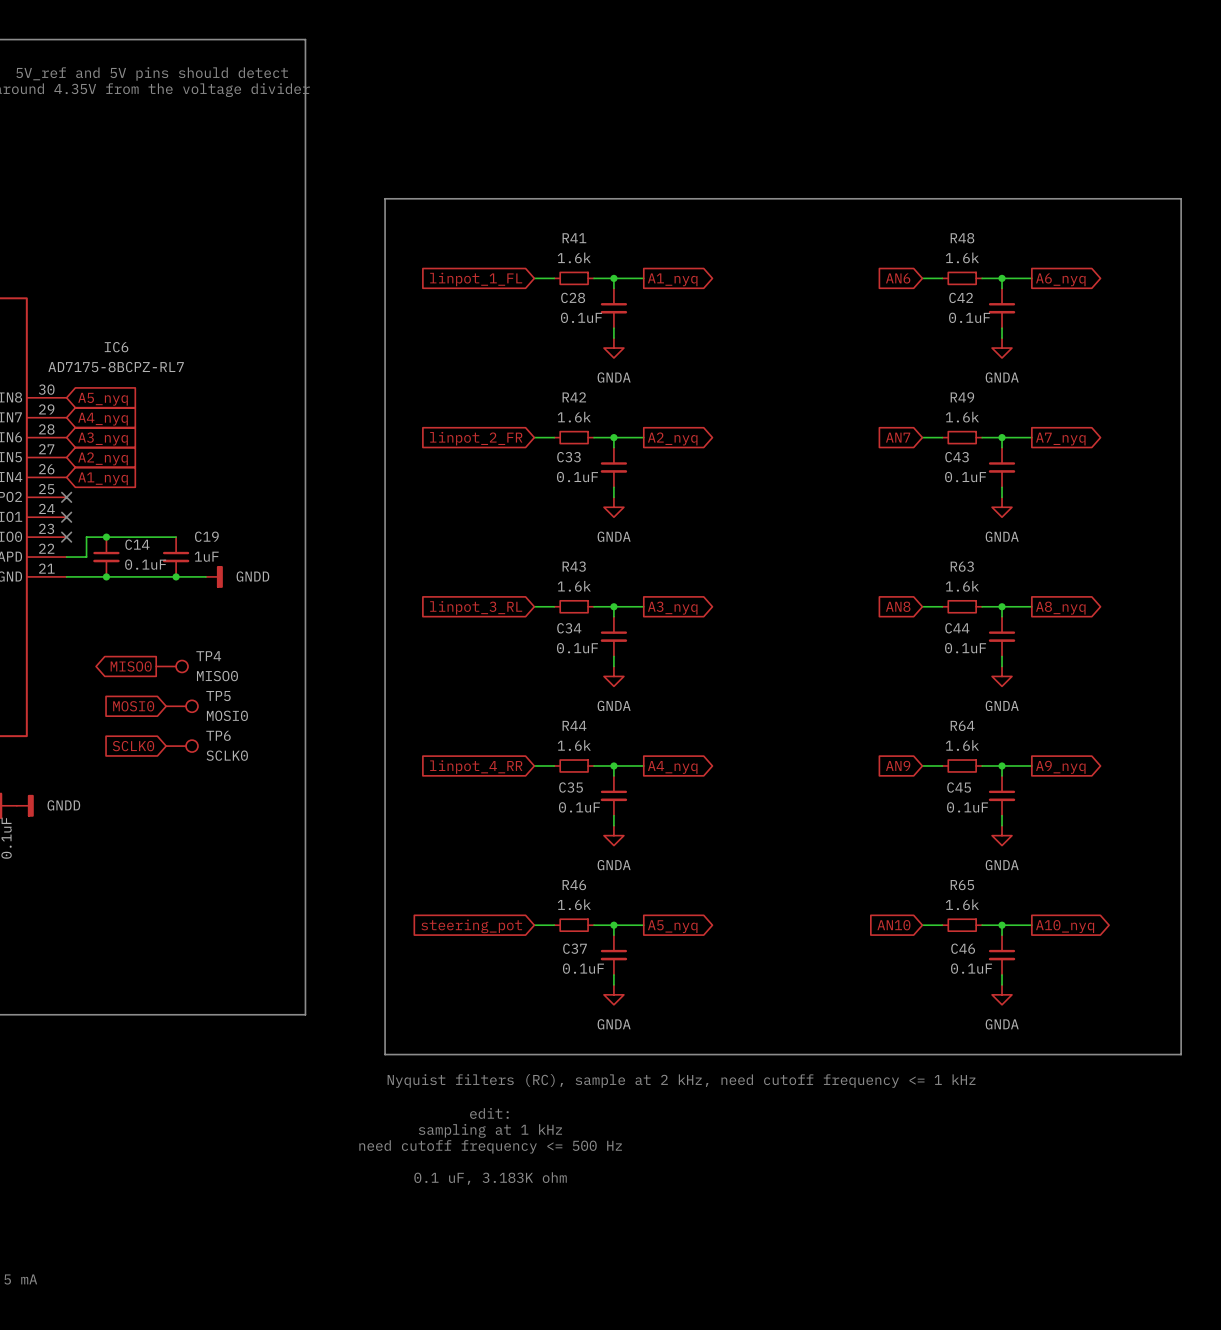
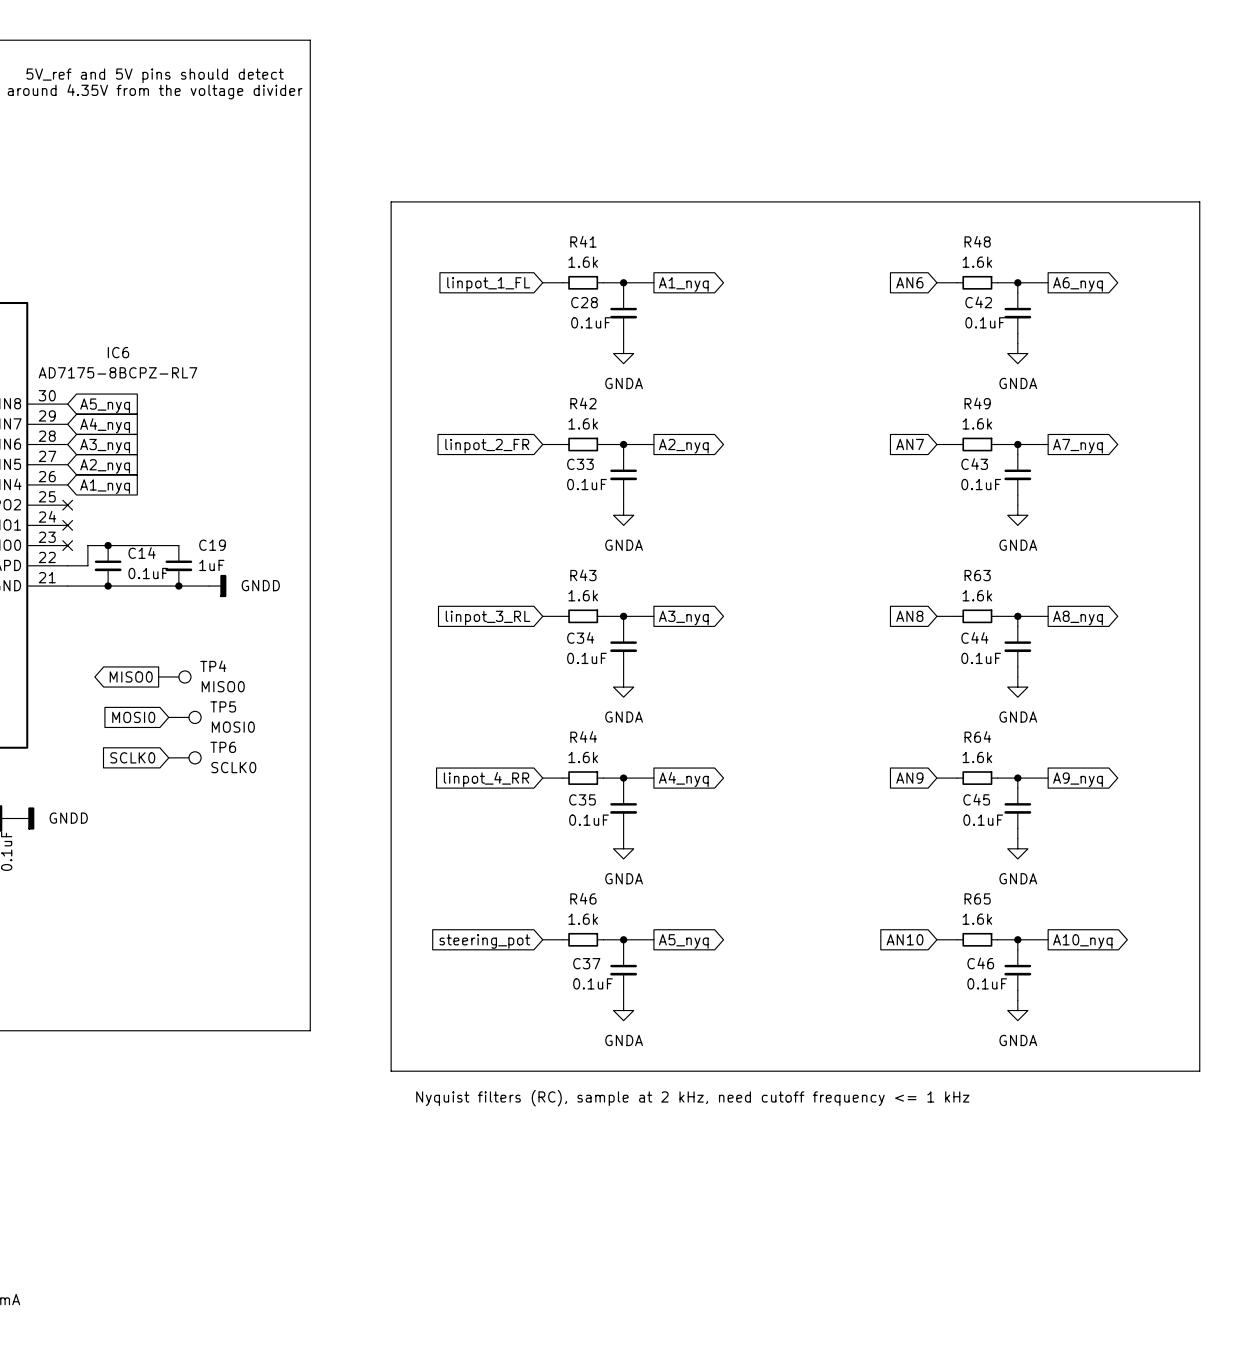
text: edit: (489, 1113) -> none
text: sampling at 1 kHz (490, 1130) -> none
text: need cutoff frequency <= 500 Hz (490, 1146) -> none
text: 0.1 uF, 3.183K ohm (490, 1178) -> none

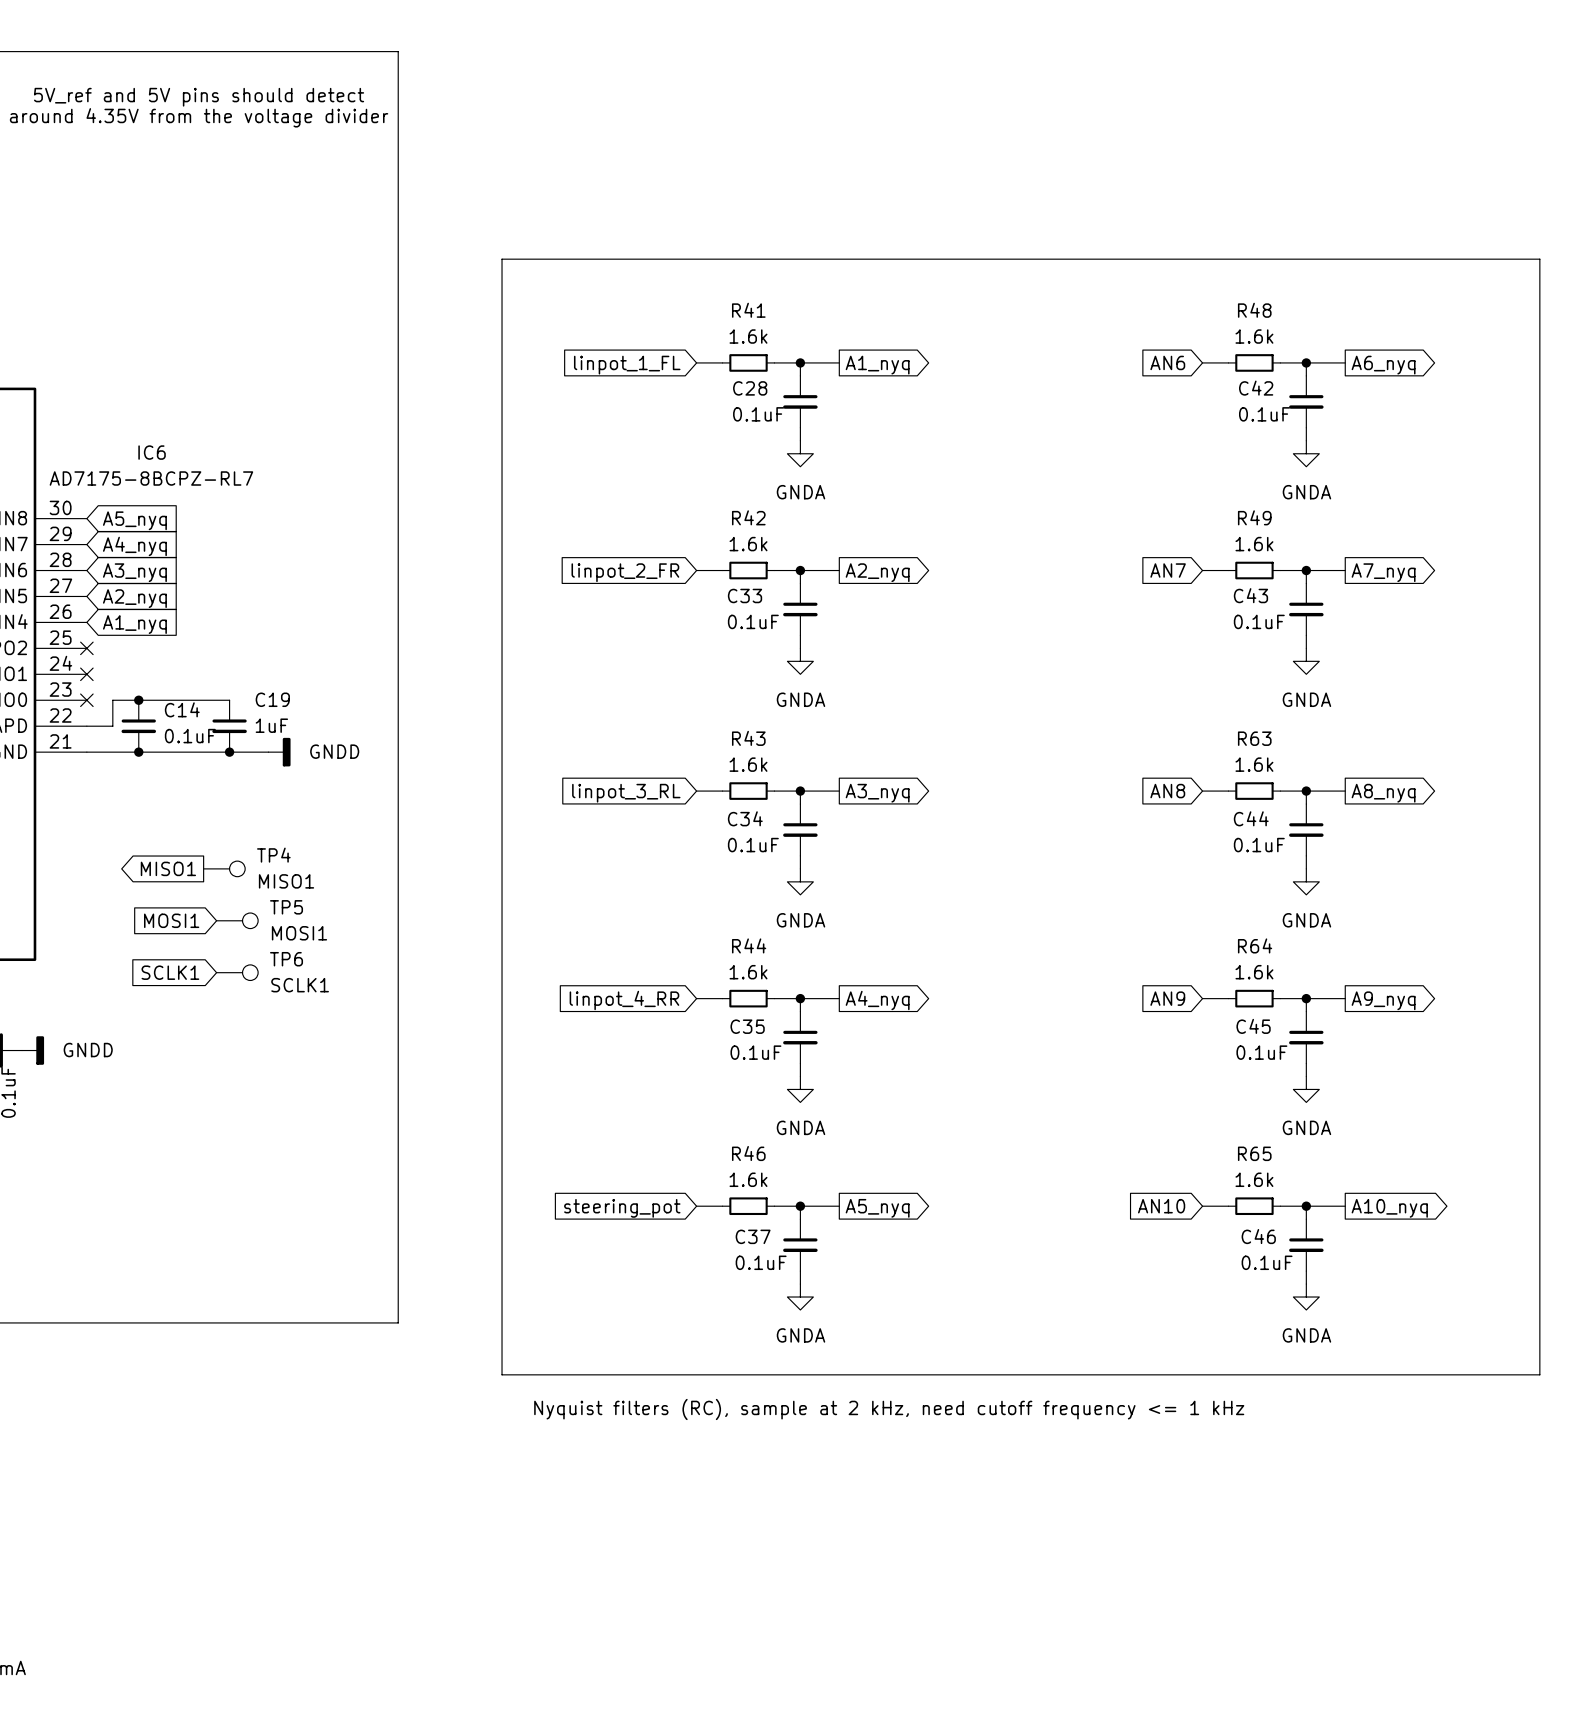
global label: MISO0 (131, 676) -> MISO1 (168, 868)
TP4 value: MISO0 (223, 686) -> MISO1 (286, 881)
global label: MOSI0 (133, 717) -> MOSI1 (171, 920)
TP5 value: MOSI0 (233, 727) -> MOSI1 (299, 933)
global label: SCLK0 (132, 757) -> SCLK1 (170, 972)
TP6 value: SCLK0 (233, 767) -> SCLK1 (300, 985)

